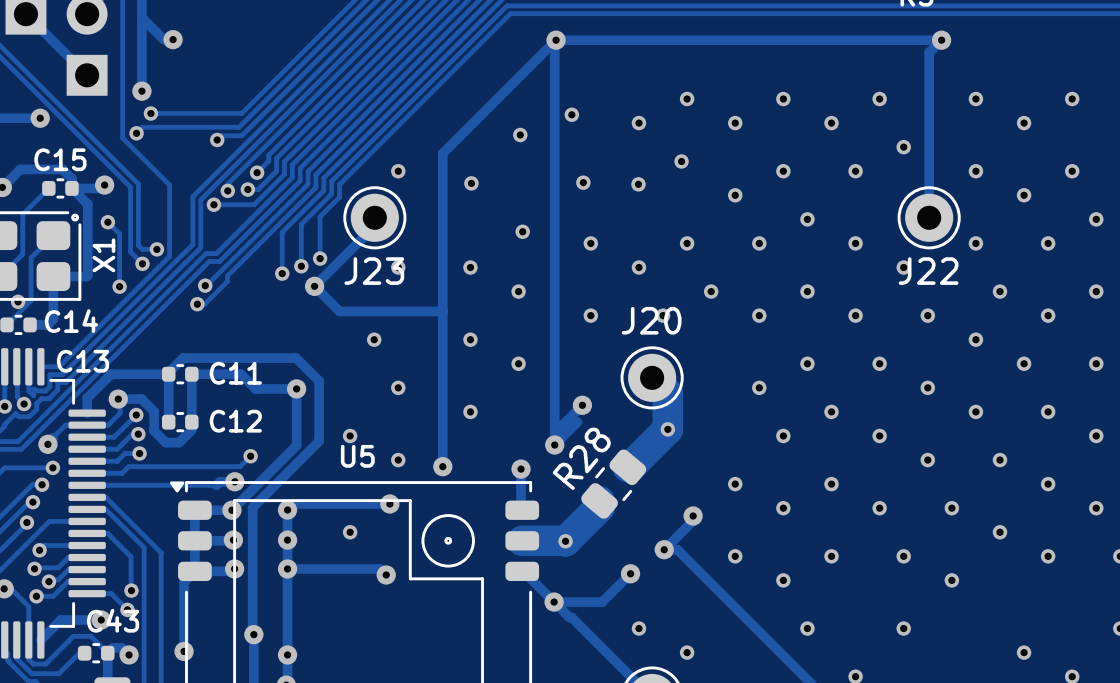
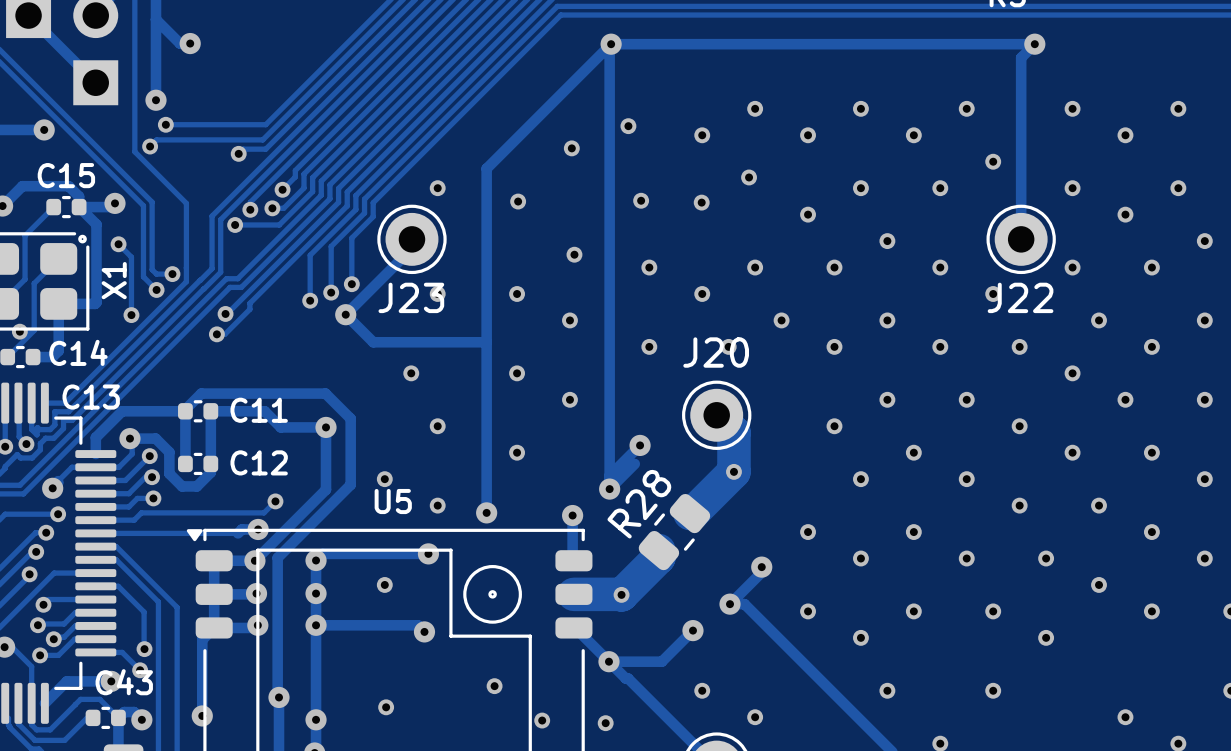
via: none -> (494, 686)
via: none -> (386, 707)
via: none -> (542, 720)
via: none -> (605, 723)

